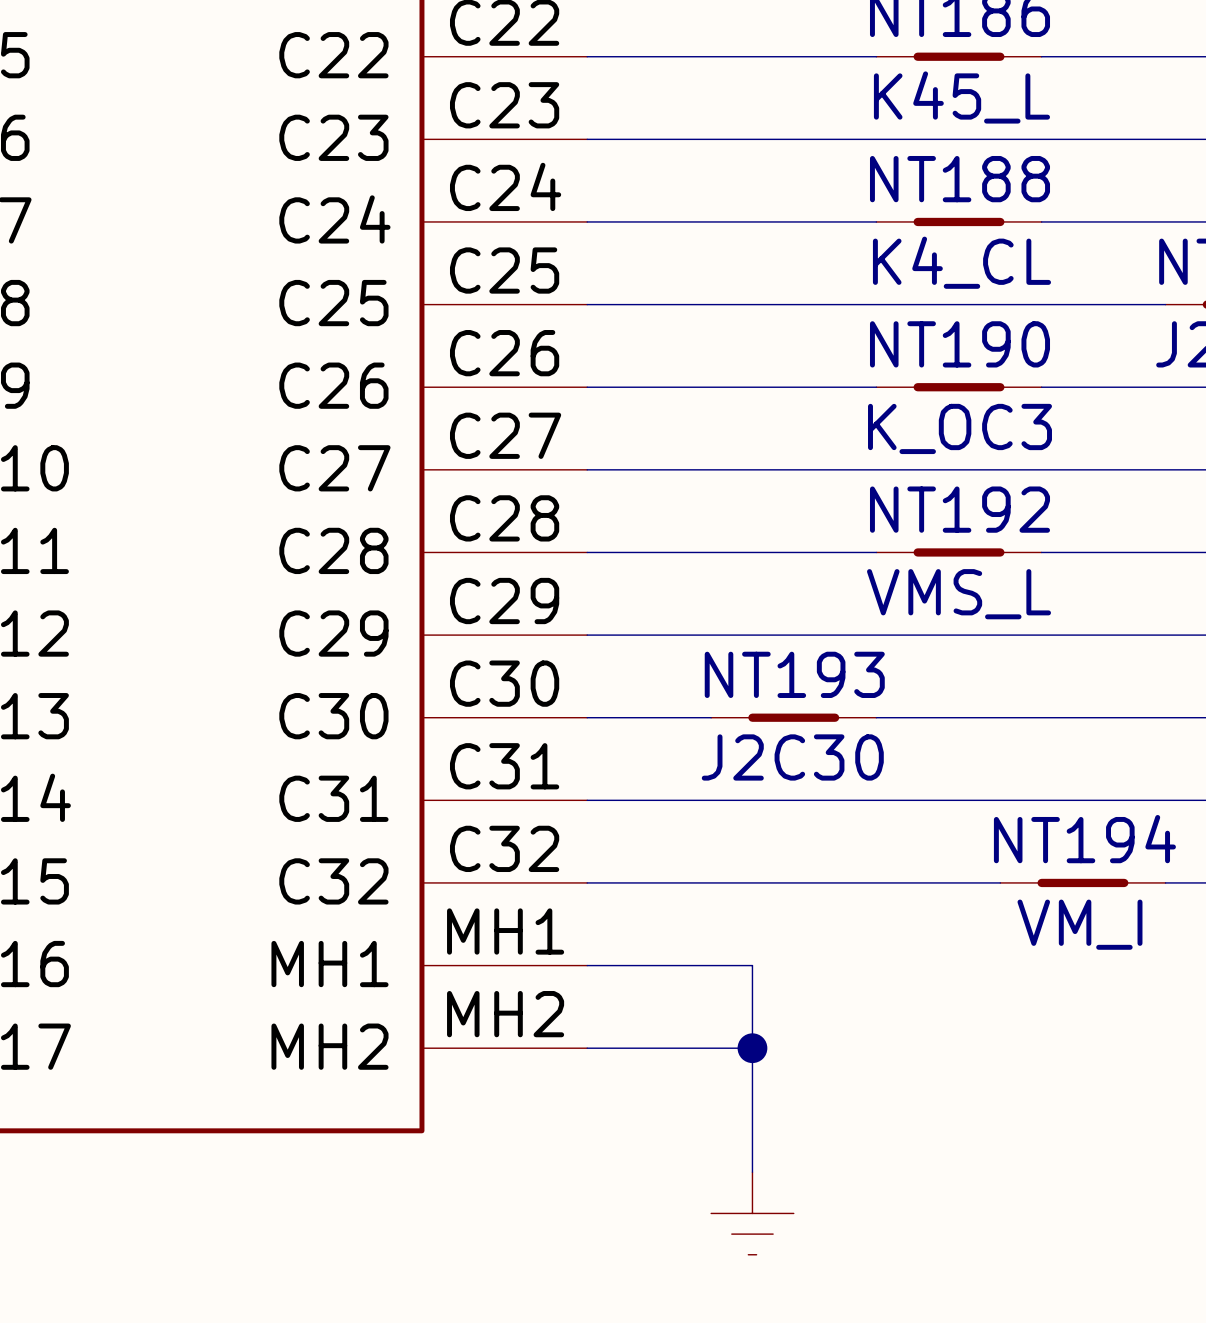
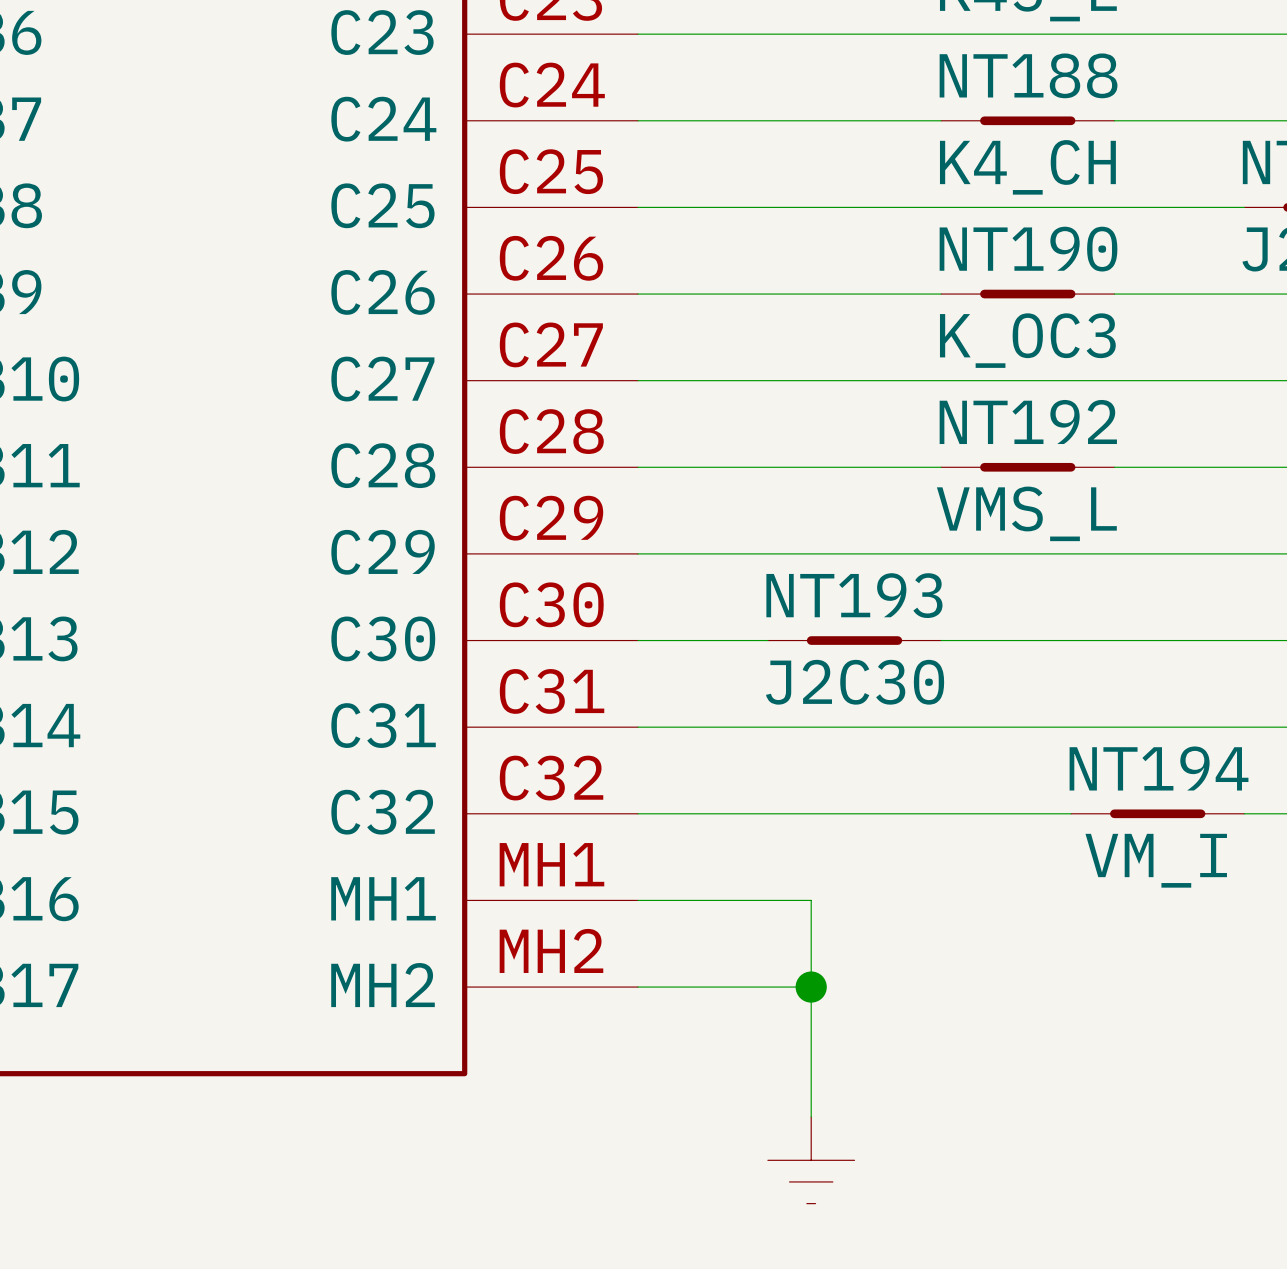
NT188 value: K4_CL (961, 262) -> K4_CH (1027, 167)

